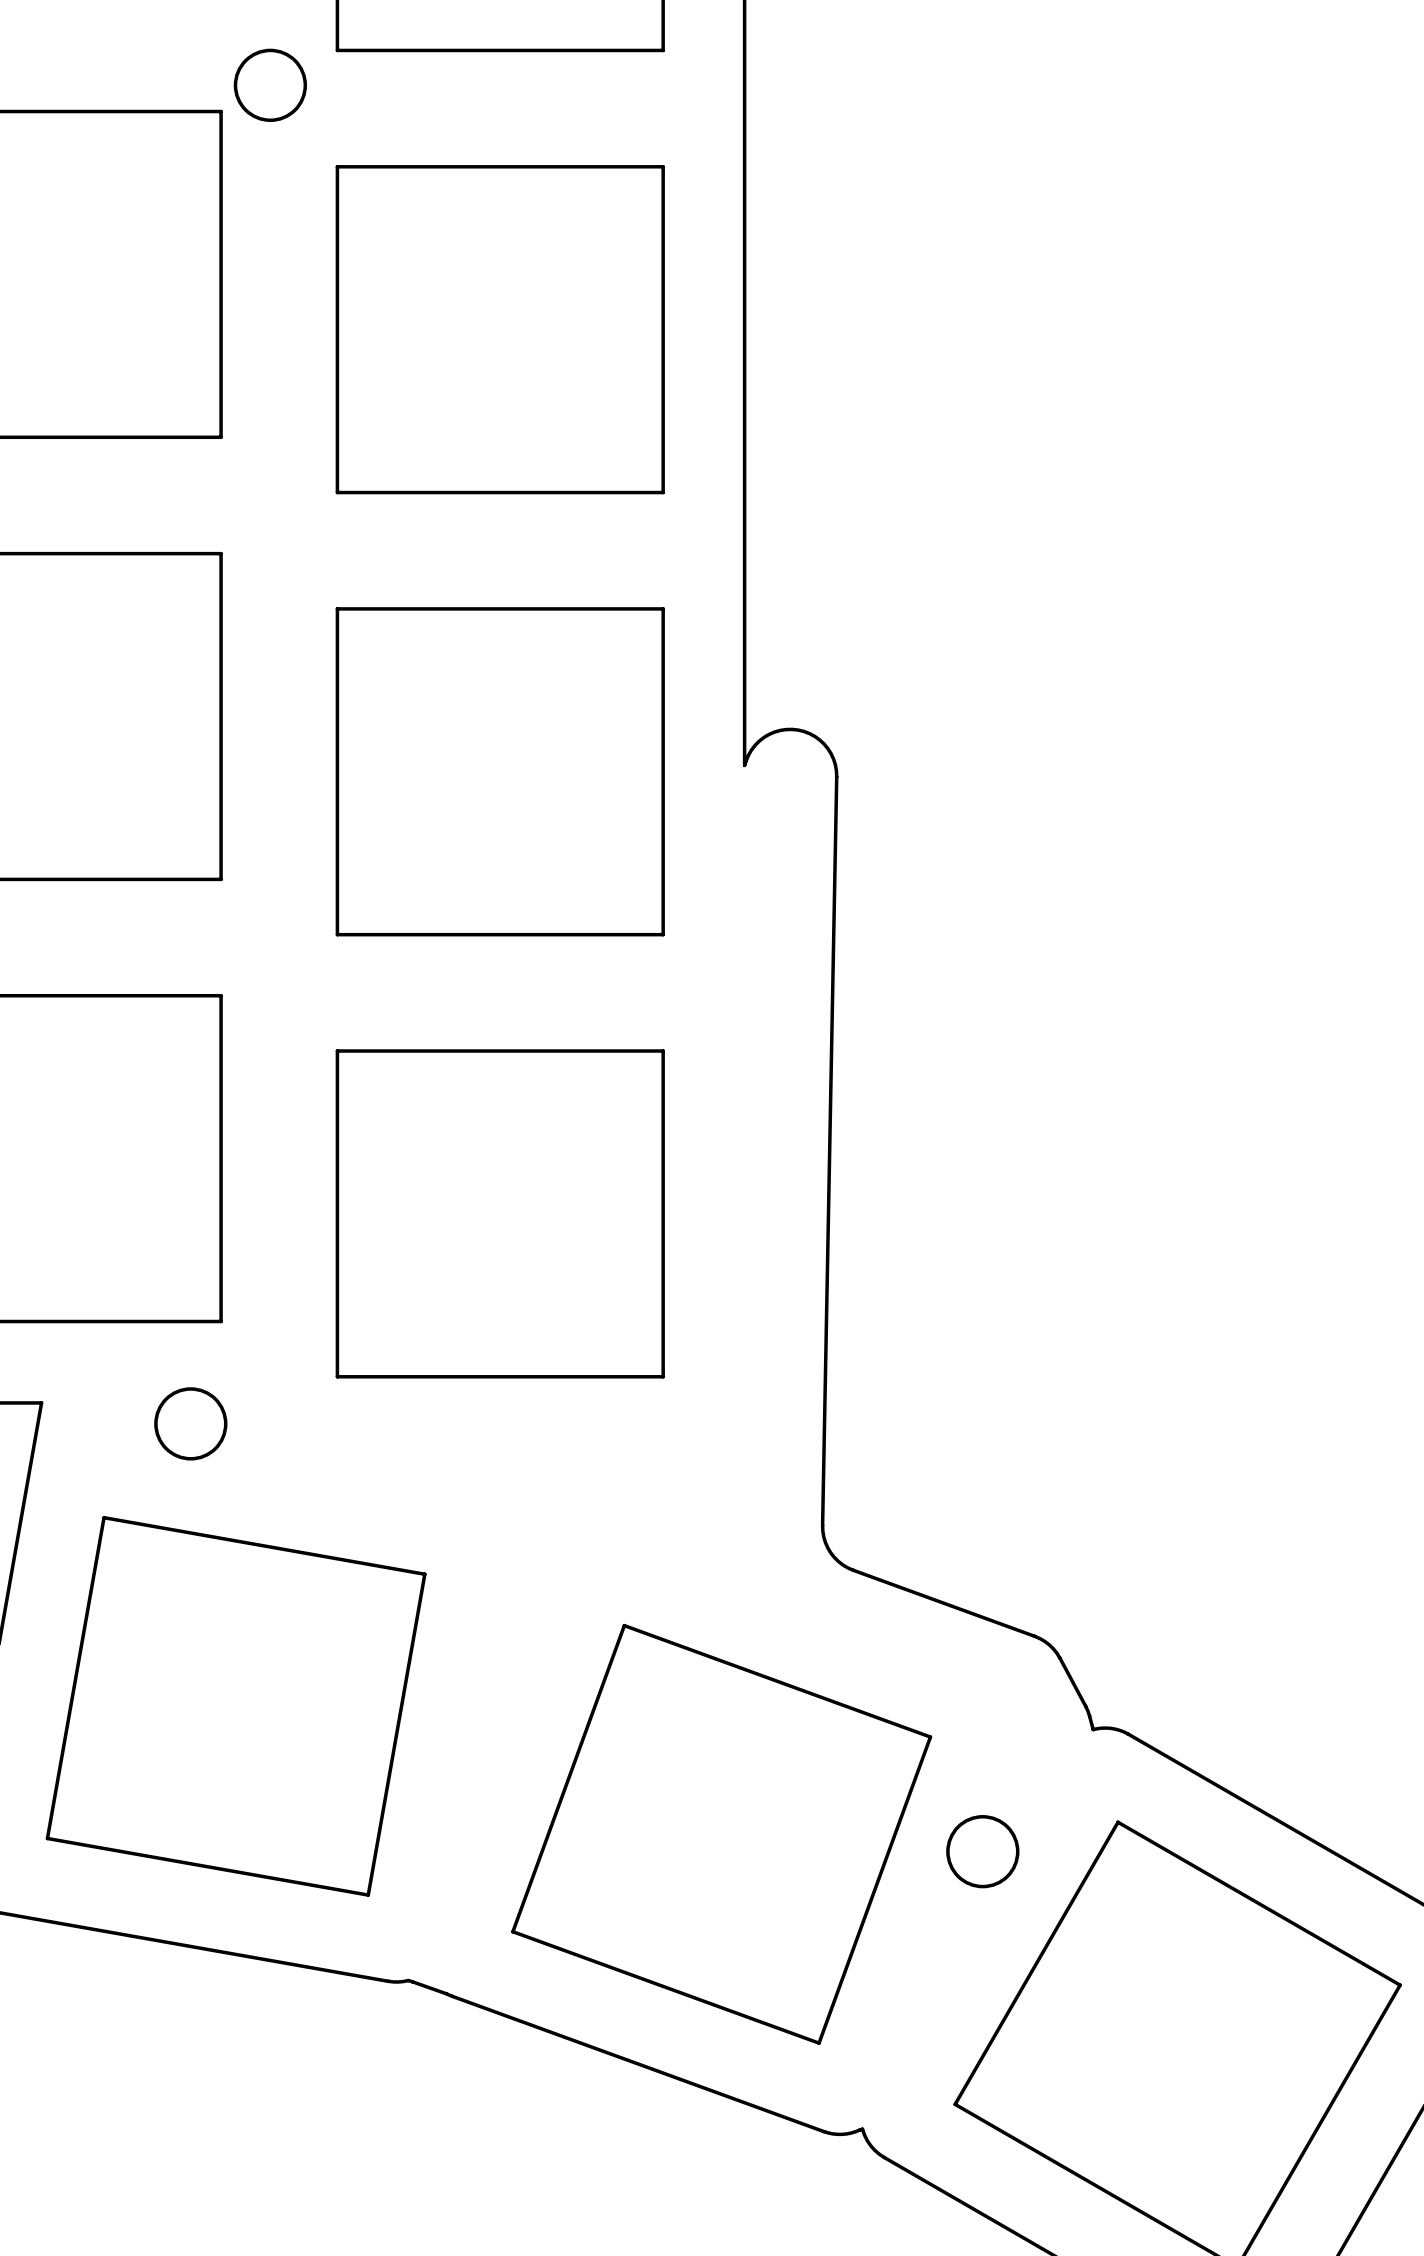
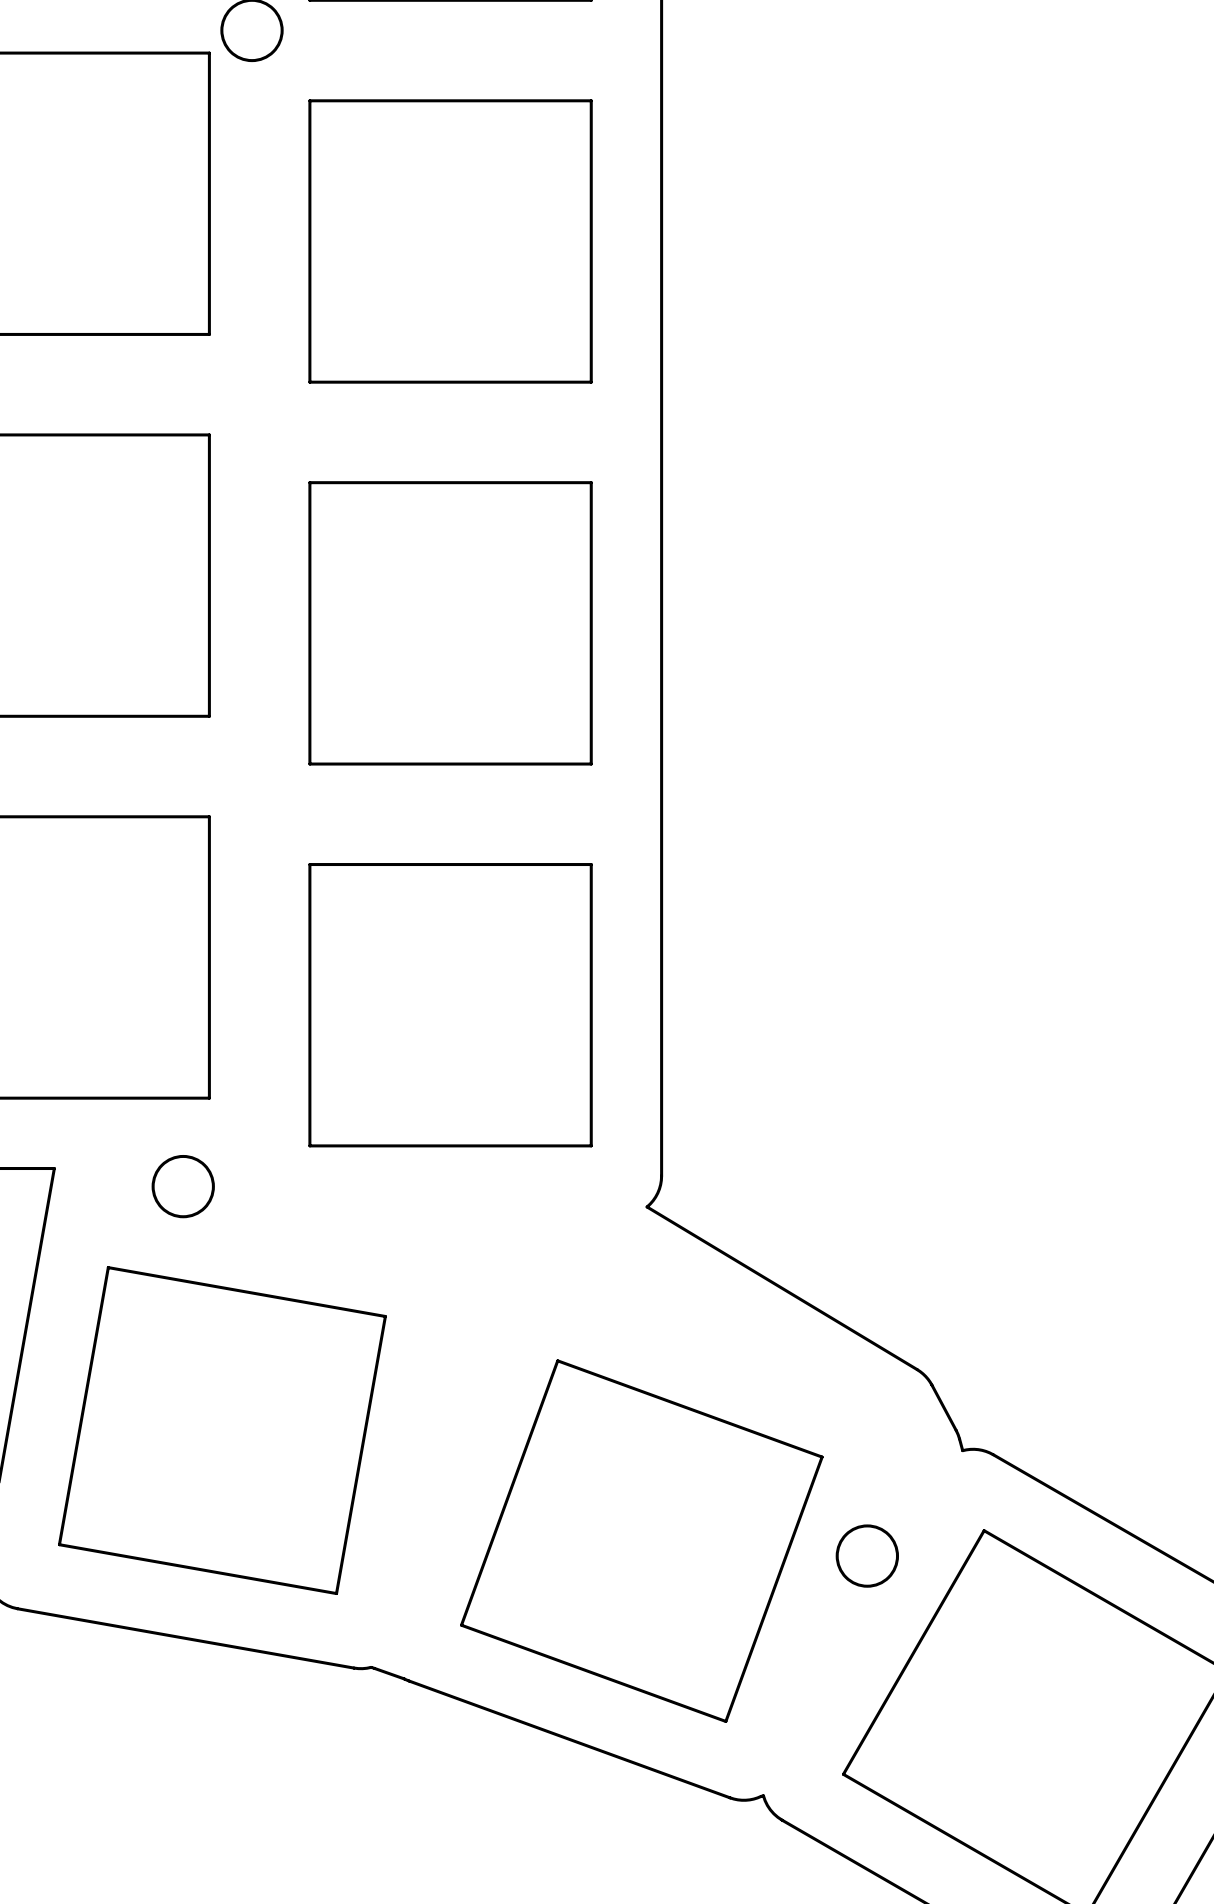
board edge: (744, 765) (751, 750) (763, 737) (780, 730) (792, 729) (809, 733) (819, 739) (831, 753) (836, 770) (822, 1525) (825, 1542) (834, 1557) (847, 1567) (1034, 1636) (1049, 1644) (1059, 1658) -> (661, 617) (661, 1176) (657, 1193) (647, 1206) (917, 1369) (925, 1376) (933, 1388)

